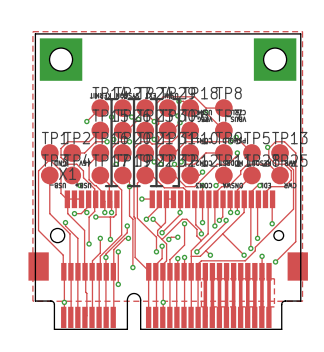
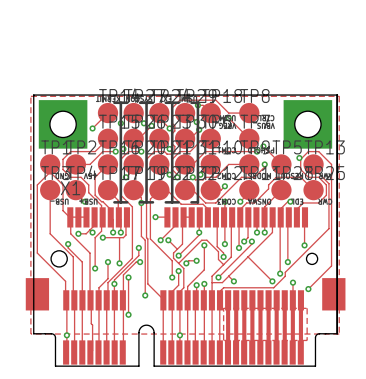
zone outline: (32, 93) (32, 31) (302, 31) (302, 93) -> (30, 96) (339, 96)
part: (168, 181) -> none
part: none -> (185, 230)

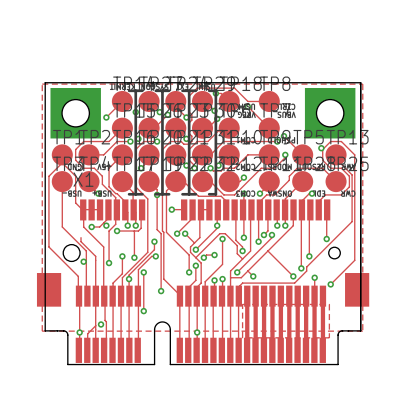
via position: (68, 244) -> (83, 261)
track: (74, 300) (74, 336) -> (95, 325) (87, 333)
via: none -> (101, 324)

